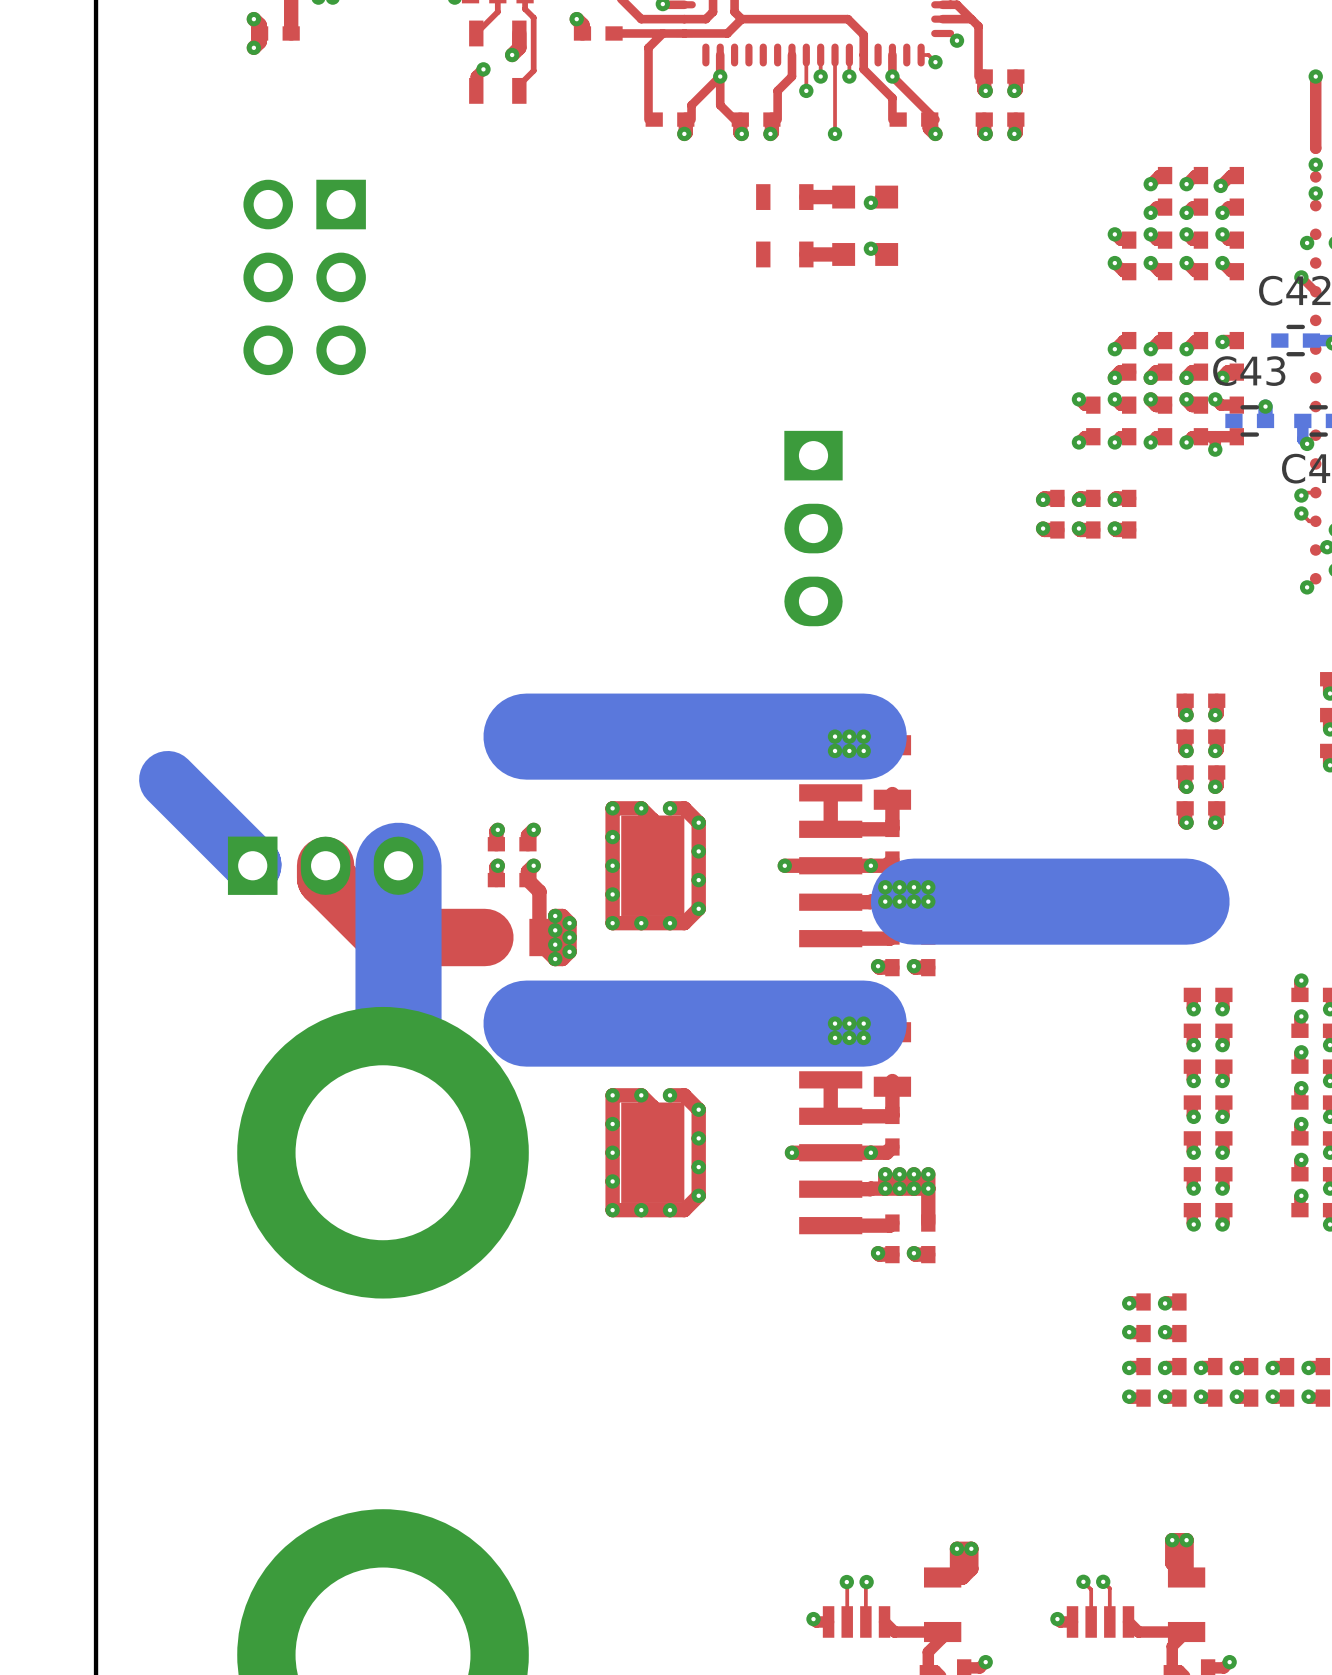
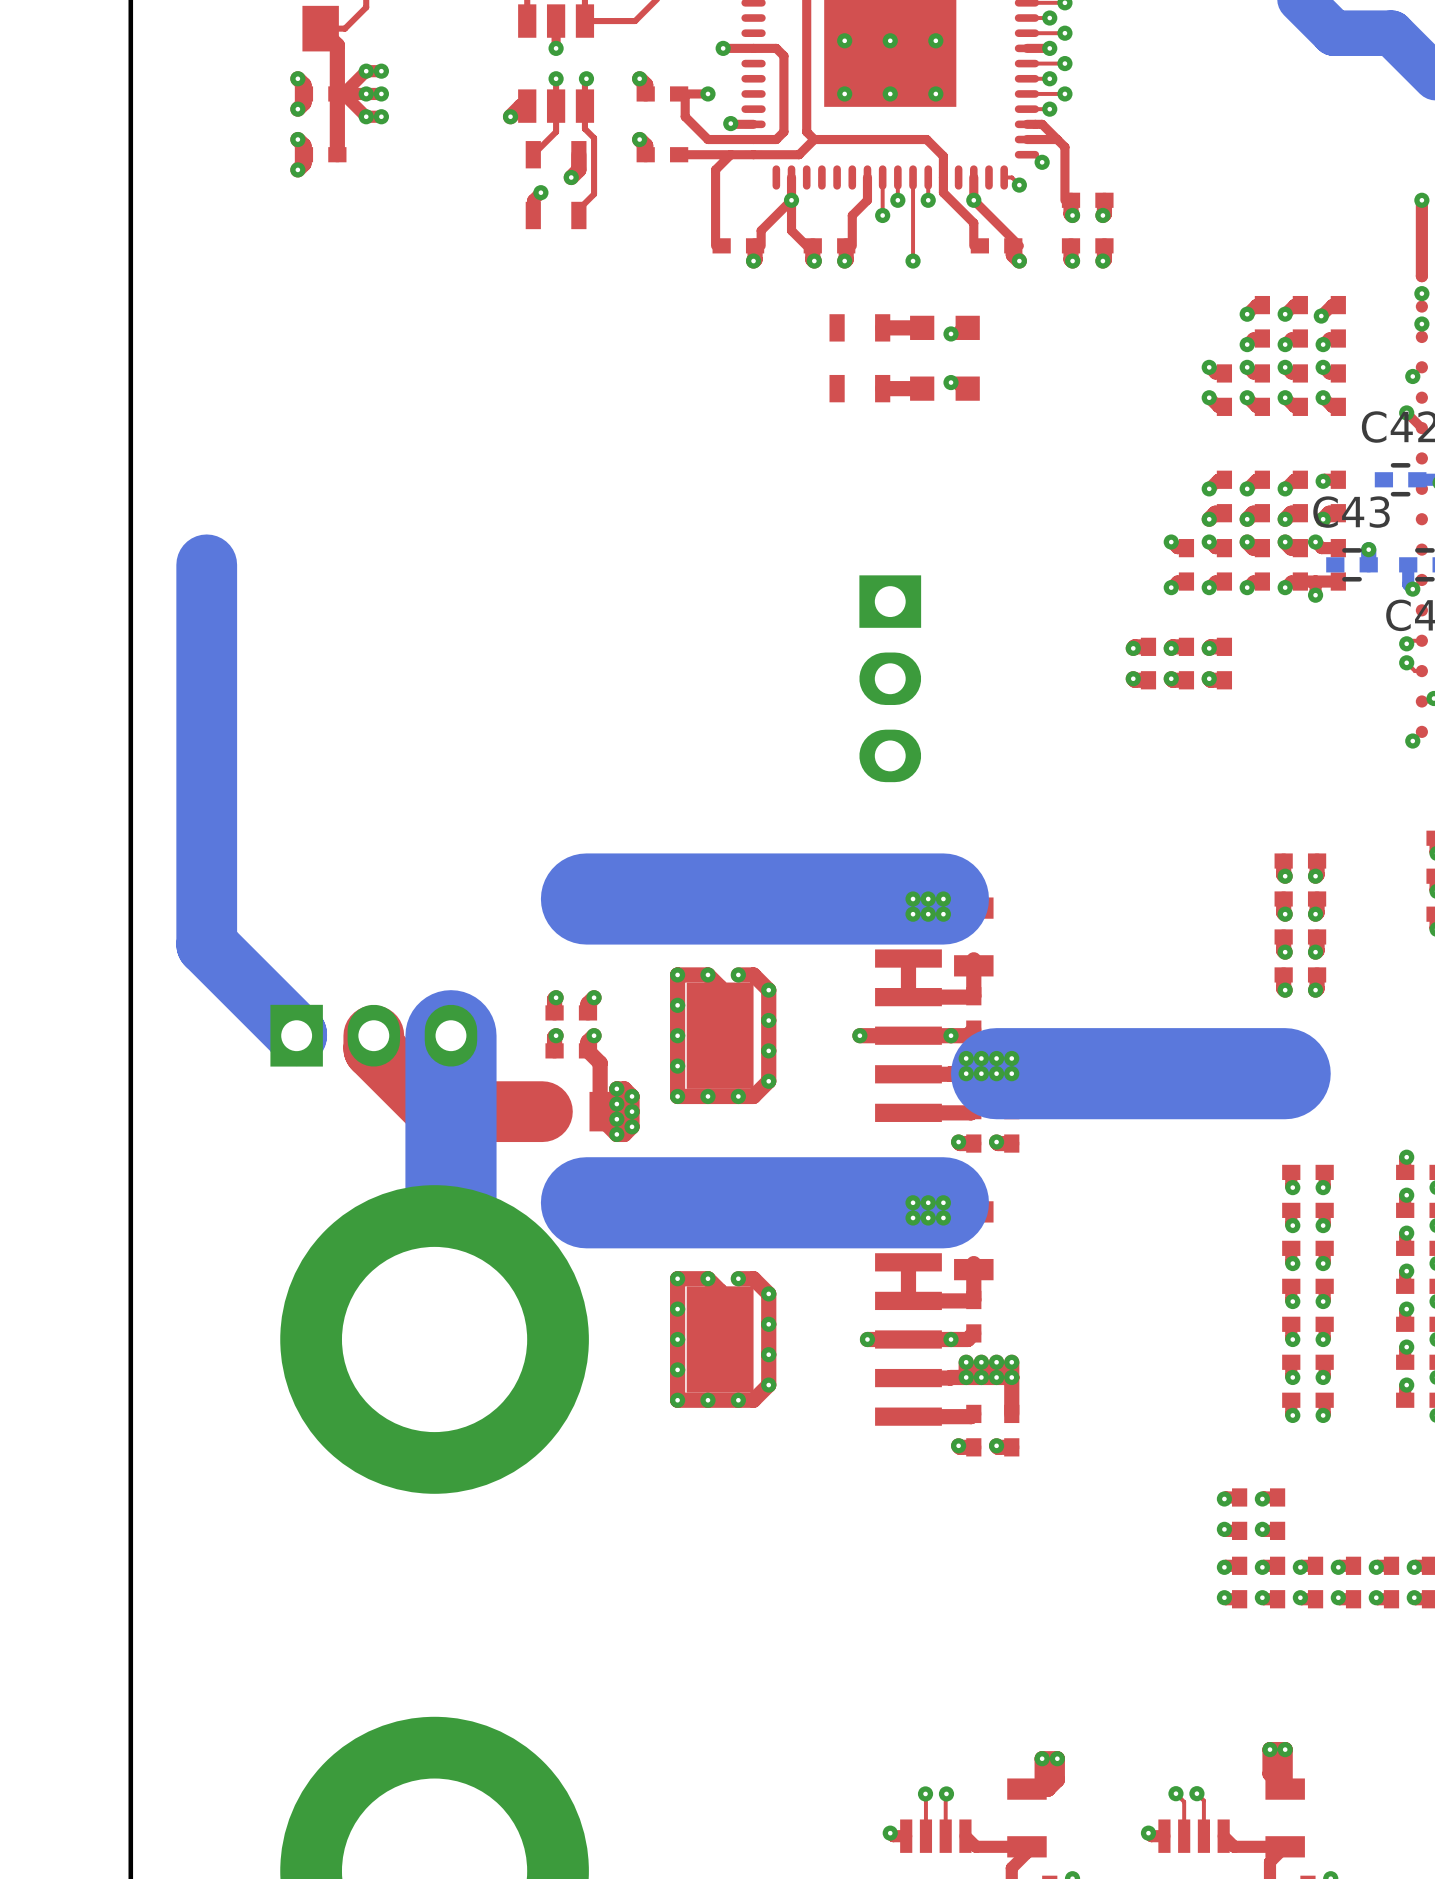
part: (304, 277) -> none
bottom track: none -> (206, 564) (206, 944)

